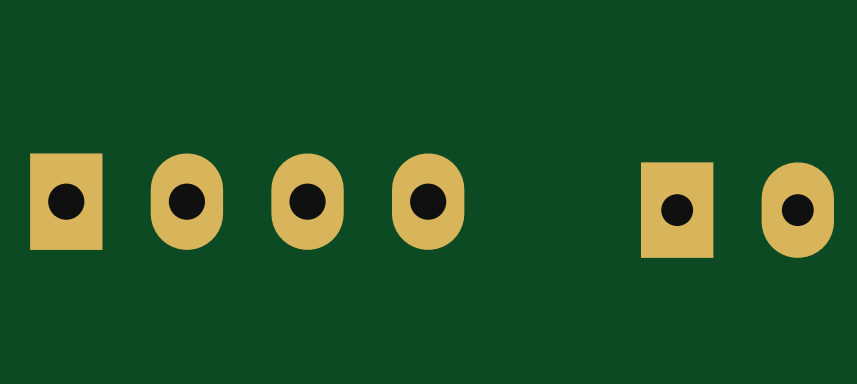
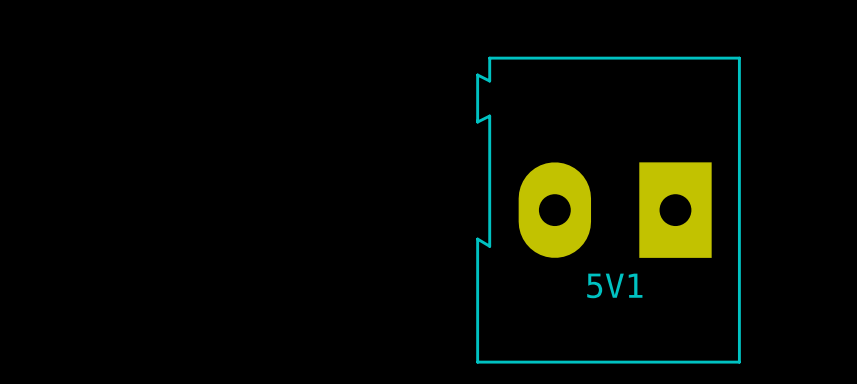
part: (247, 201) -> none
5V1 side: bottom (737, 210) -> top (608, 210)

